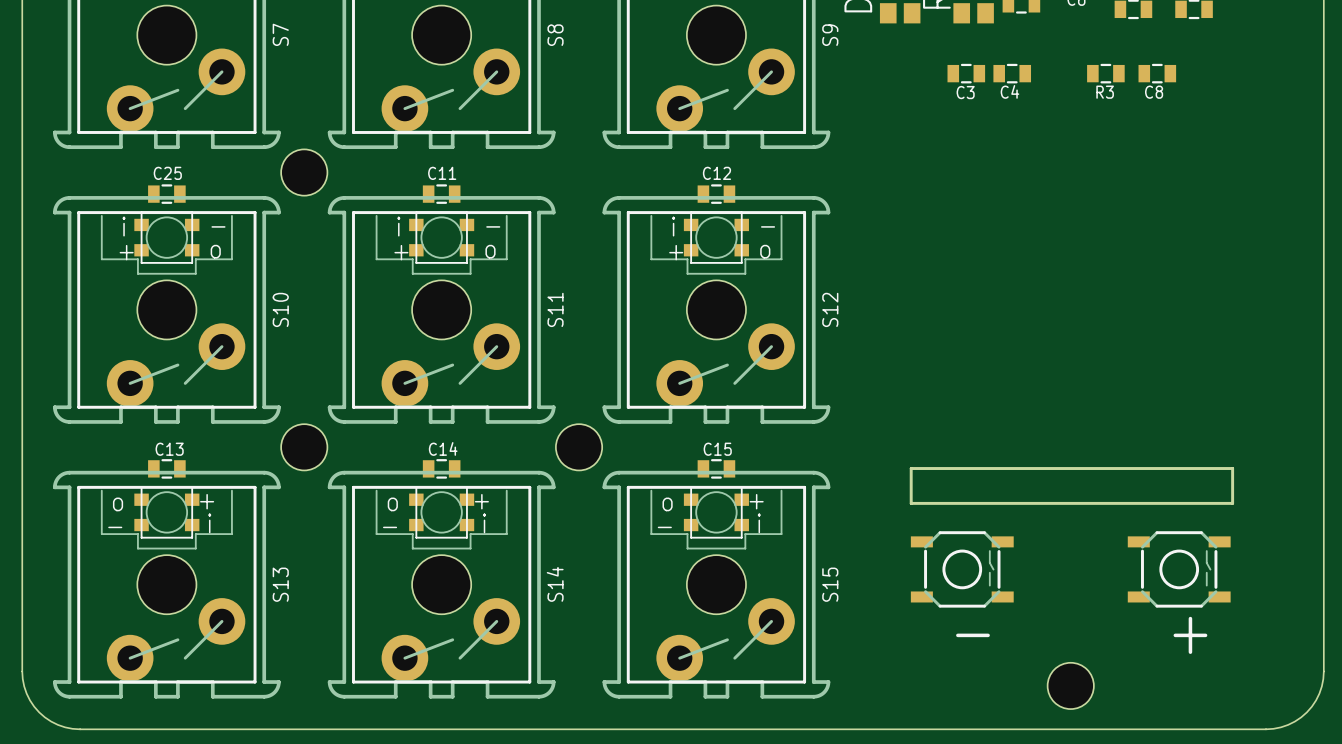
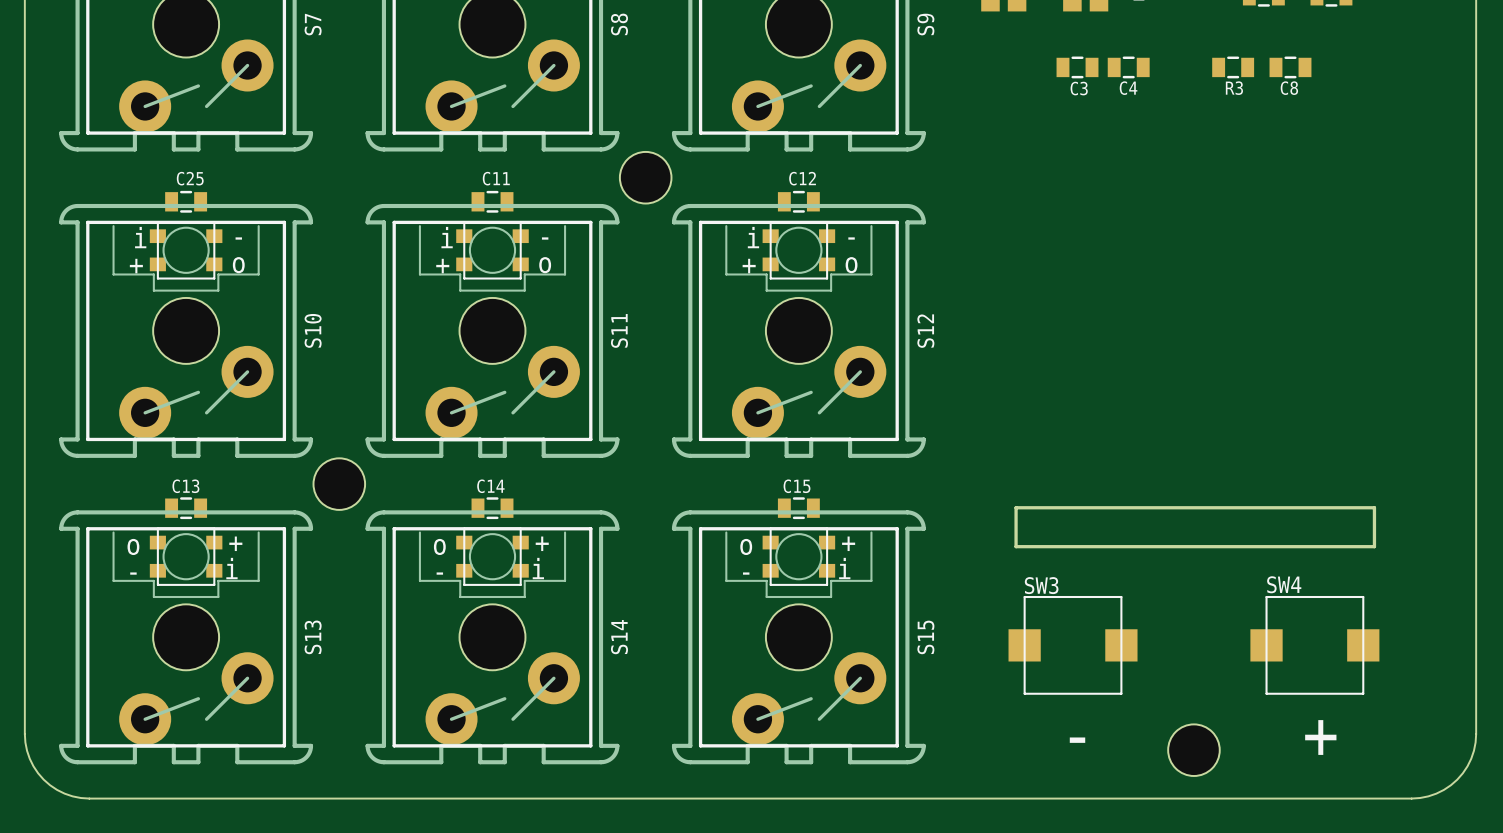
part: (304, 172) -> none
part: none -> (645, 177)
part: (579, 447) -> none
part: (962, 569) -> none
part: (1179, 569) -> none
SW3: none -> (1073, 645)
SW4: none -> (1314, 645)
text position: - (972, 635) -> - (1077, 740)
text position: + (1190, 635) -> + (1320, 737)

